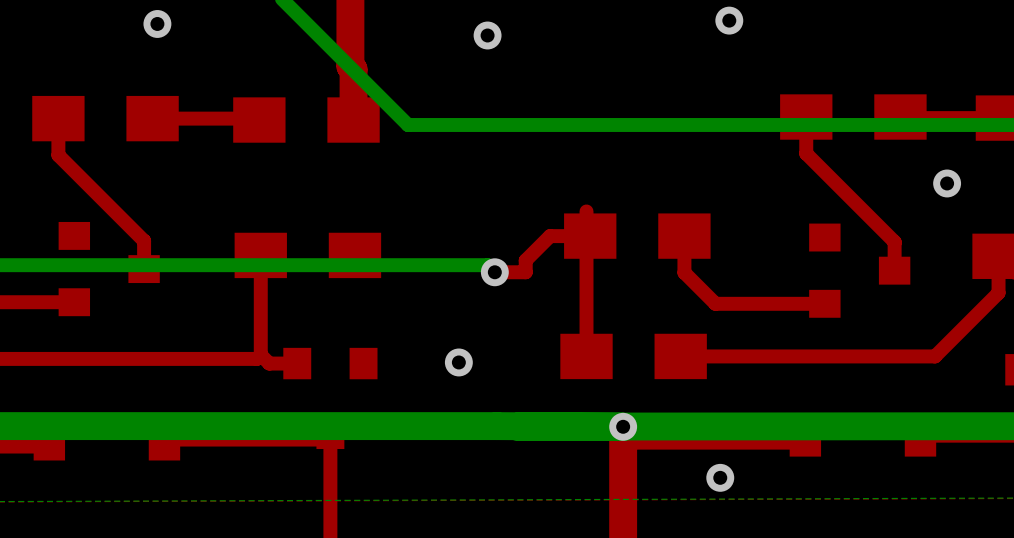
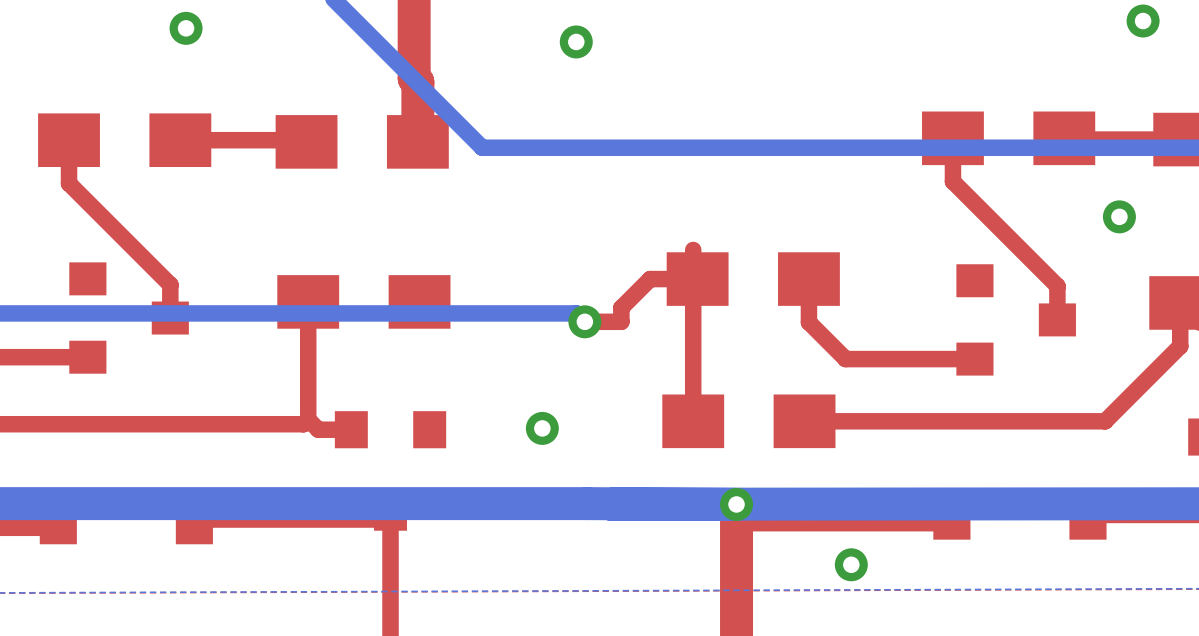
via: none -> (1143, 21)
via: (729, 20) -> none

